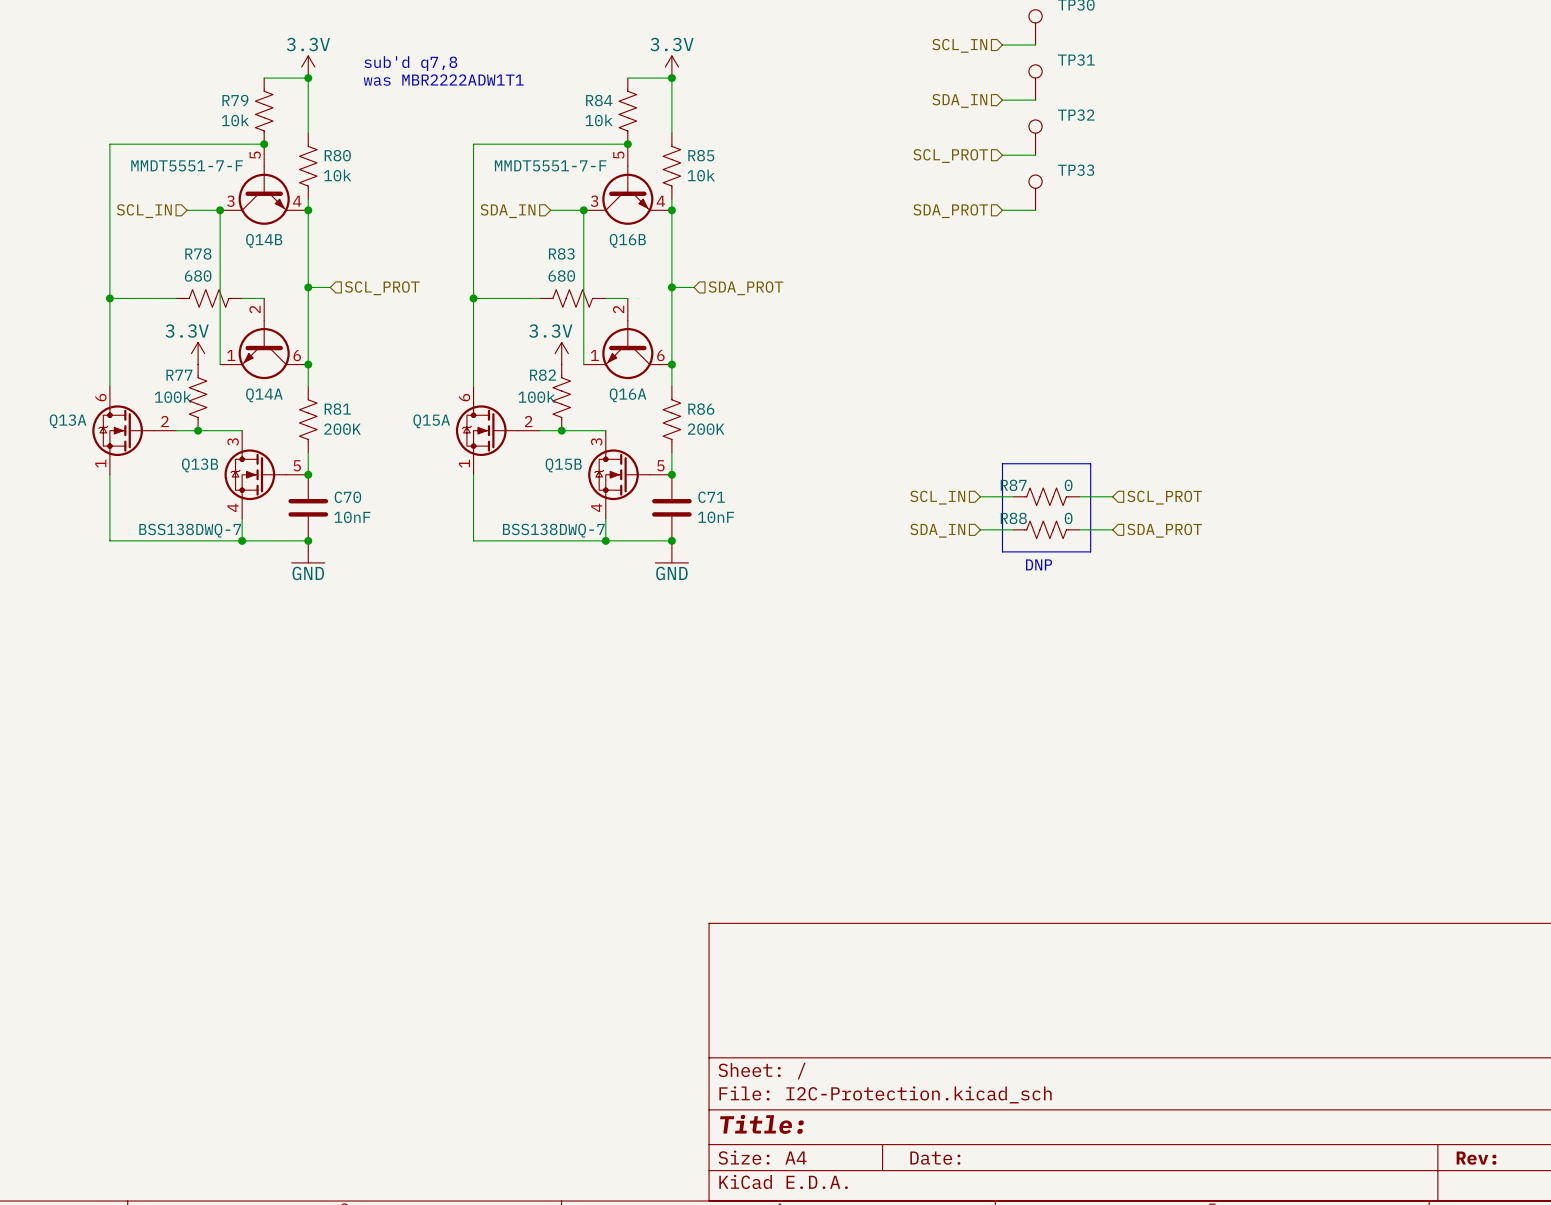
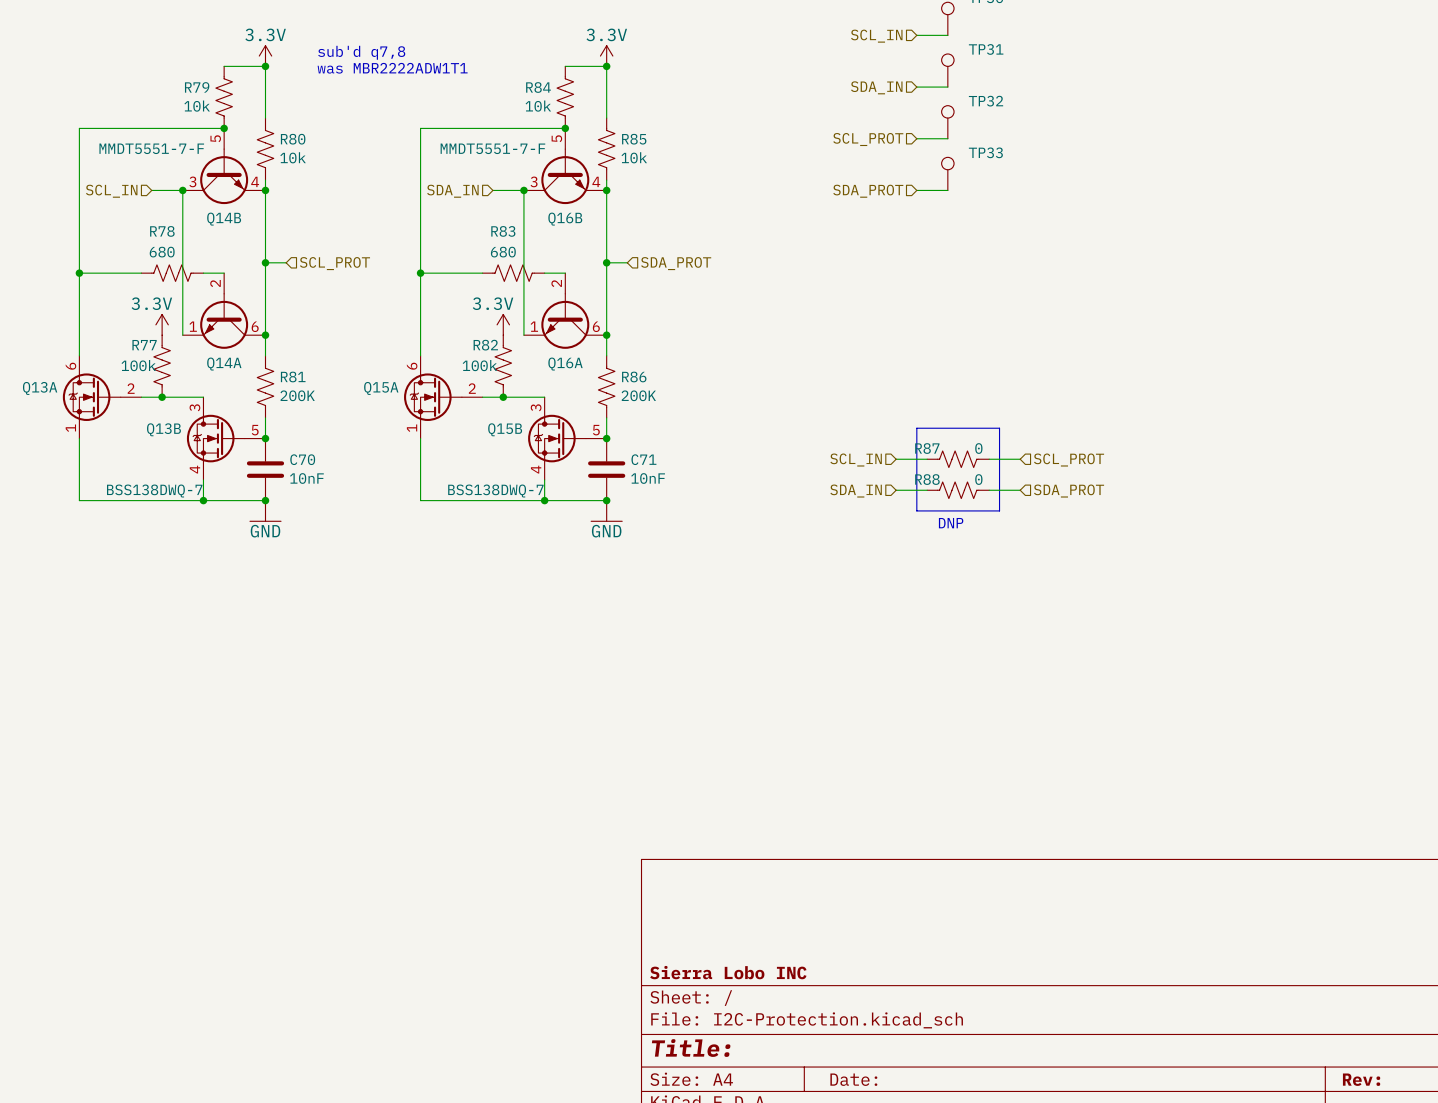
title block: none -> Sierra Lobo INC (728, 972)

